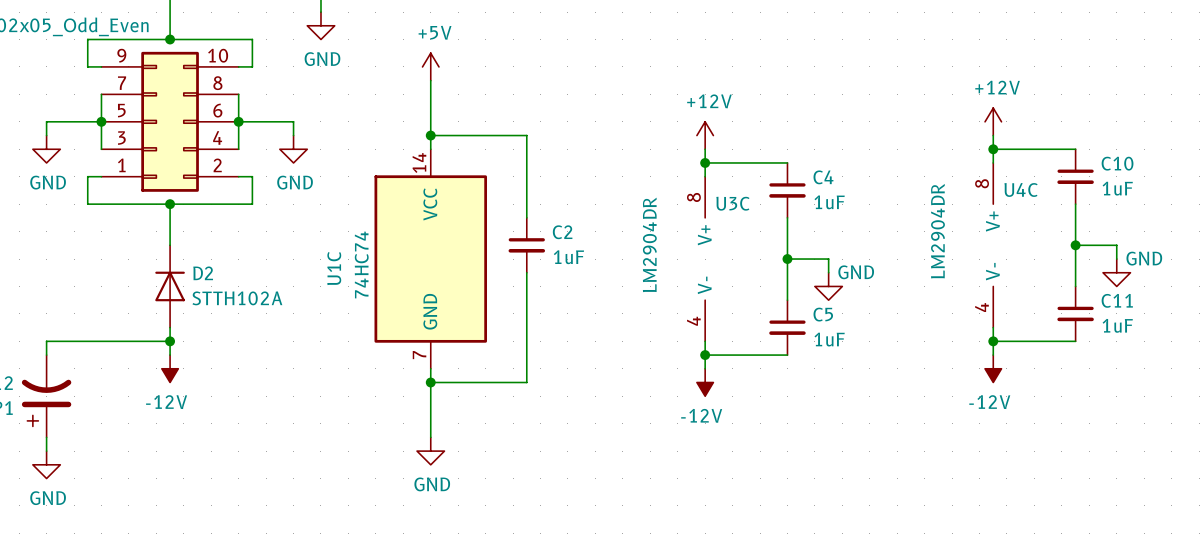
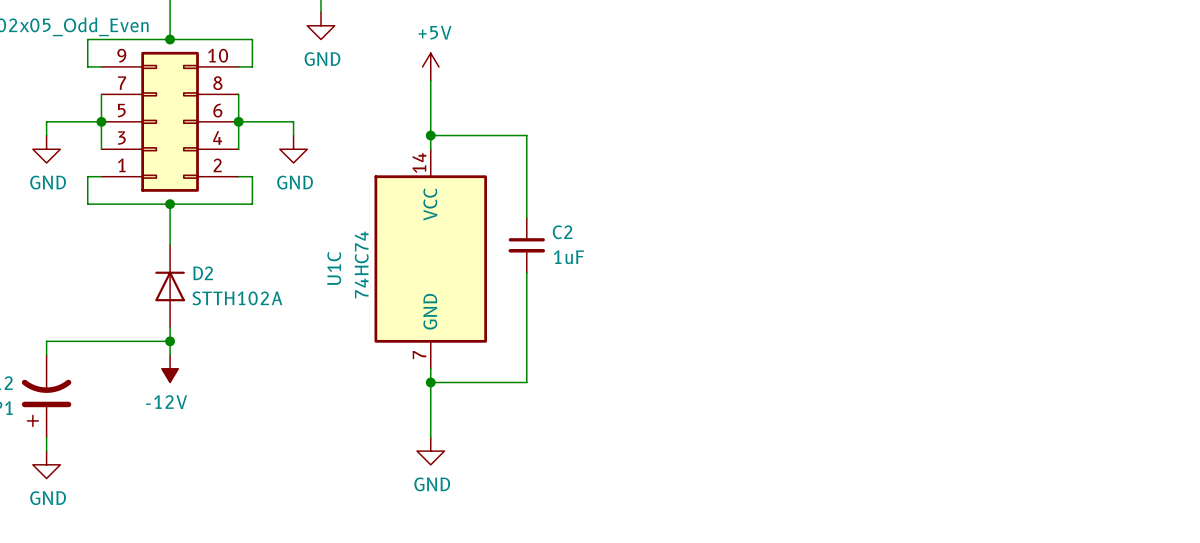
power symbol: +12V (993, 121) -> none
power symbol: +12V (705, 135) -> none
wire: (993, 135) (993, 162) -> none
wire: (705, 149) (705, 176) -> none
wire: (993, 149) (1075, 149) -> none
junction: (993, 149) -> none
wire: (705, 162) (787, 162) -> none
junction: (705, 162) -> none
C10: 1uF (1075, 176) -> none
C4: 1uF (787, 190) -> none
wire: (1075, 204) (1075, 286) -> none
wire: (787, 217) (787, 300) -> none
U4C: LM2904DR (993, 245) -> none
wire: (1075, 245) (1116, 245) (1116, 259) -> none
junction: (1075, 245) -> none
U3C: LM2904DR (705, 259) -> none
wire: (787, 259) (828, 259) (828, 272) -> none
junction: (787, 259) -> none
power symbol: GND (1116, 272) -> none
power symbol: GND (828, 286) -> none
C11: 1uF (1075, 313) -> none
C5: 1uF (787, 327) -> none
wire: (993, 327) (993, 355) -> none
wire: (705, 341) (705, 368) -> none
wire: (993, 341) (1075, 341) -> none
junction: (993, 341) -> none
wire: (705, 355) (787, 355) -> none
junction: (705, 355) -> none
power symbol: -12V (993, 368) -> none
power symbol: -12V (705, 382) -> none

